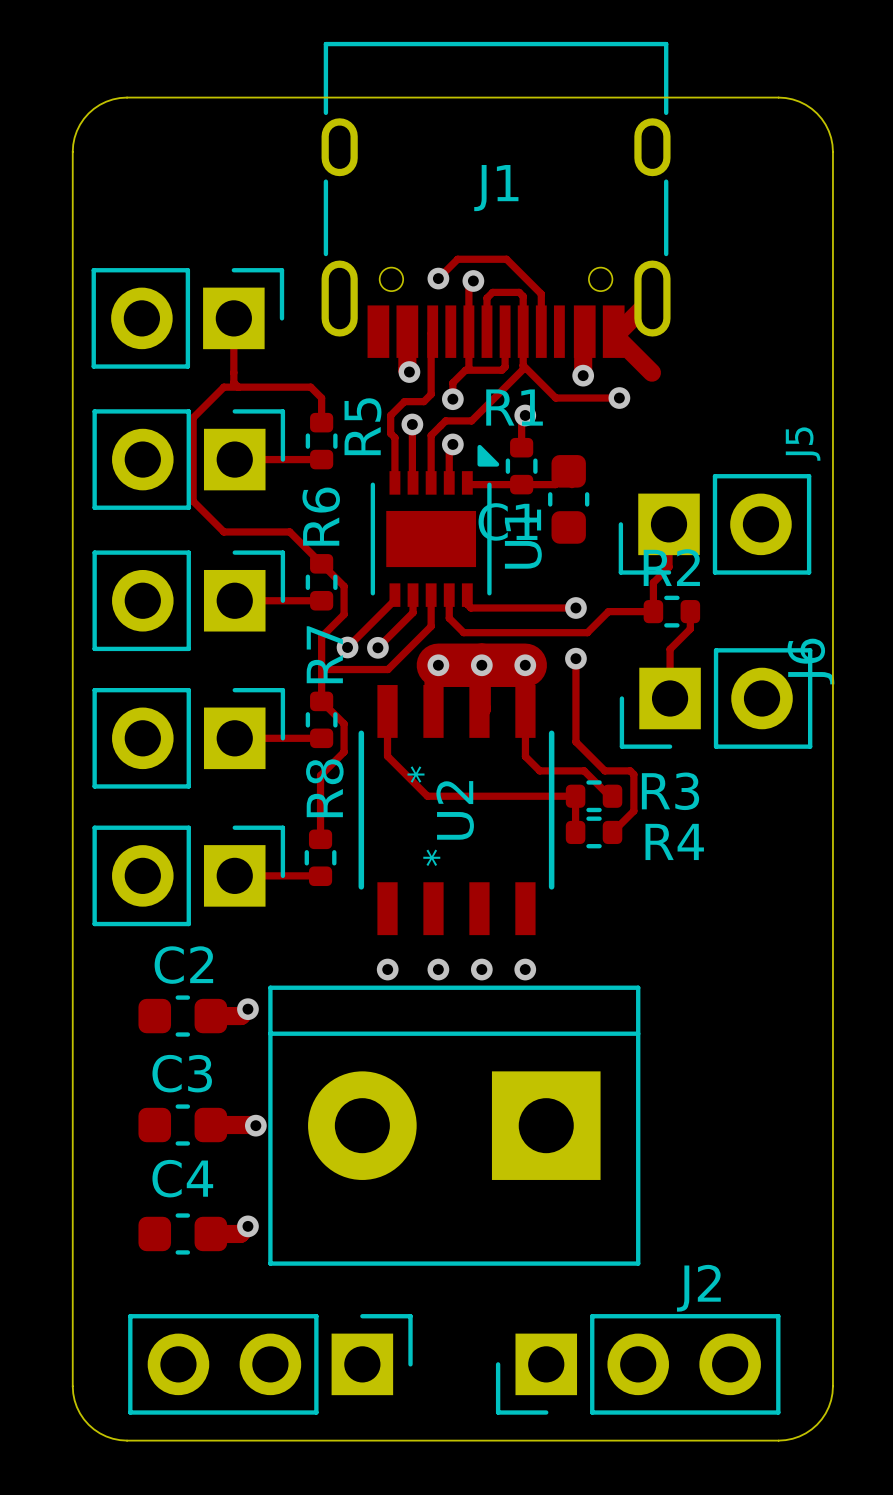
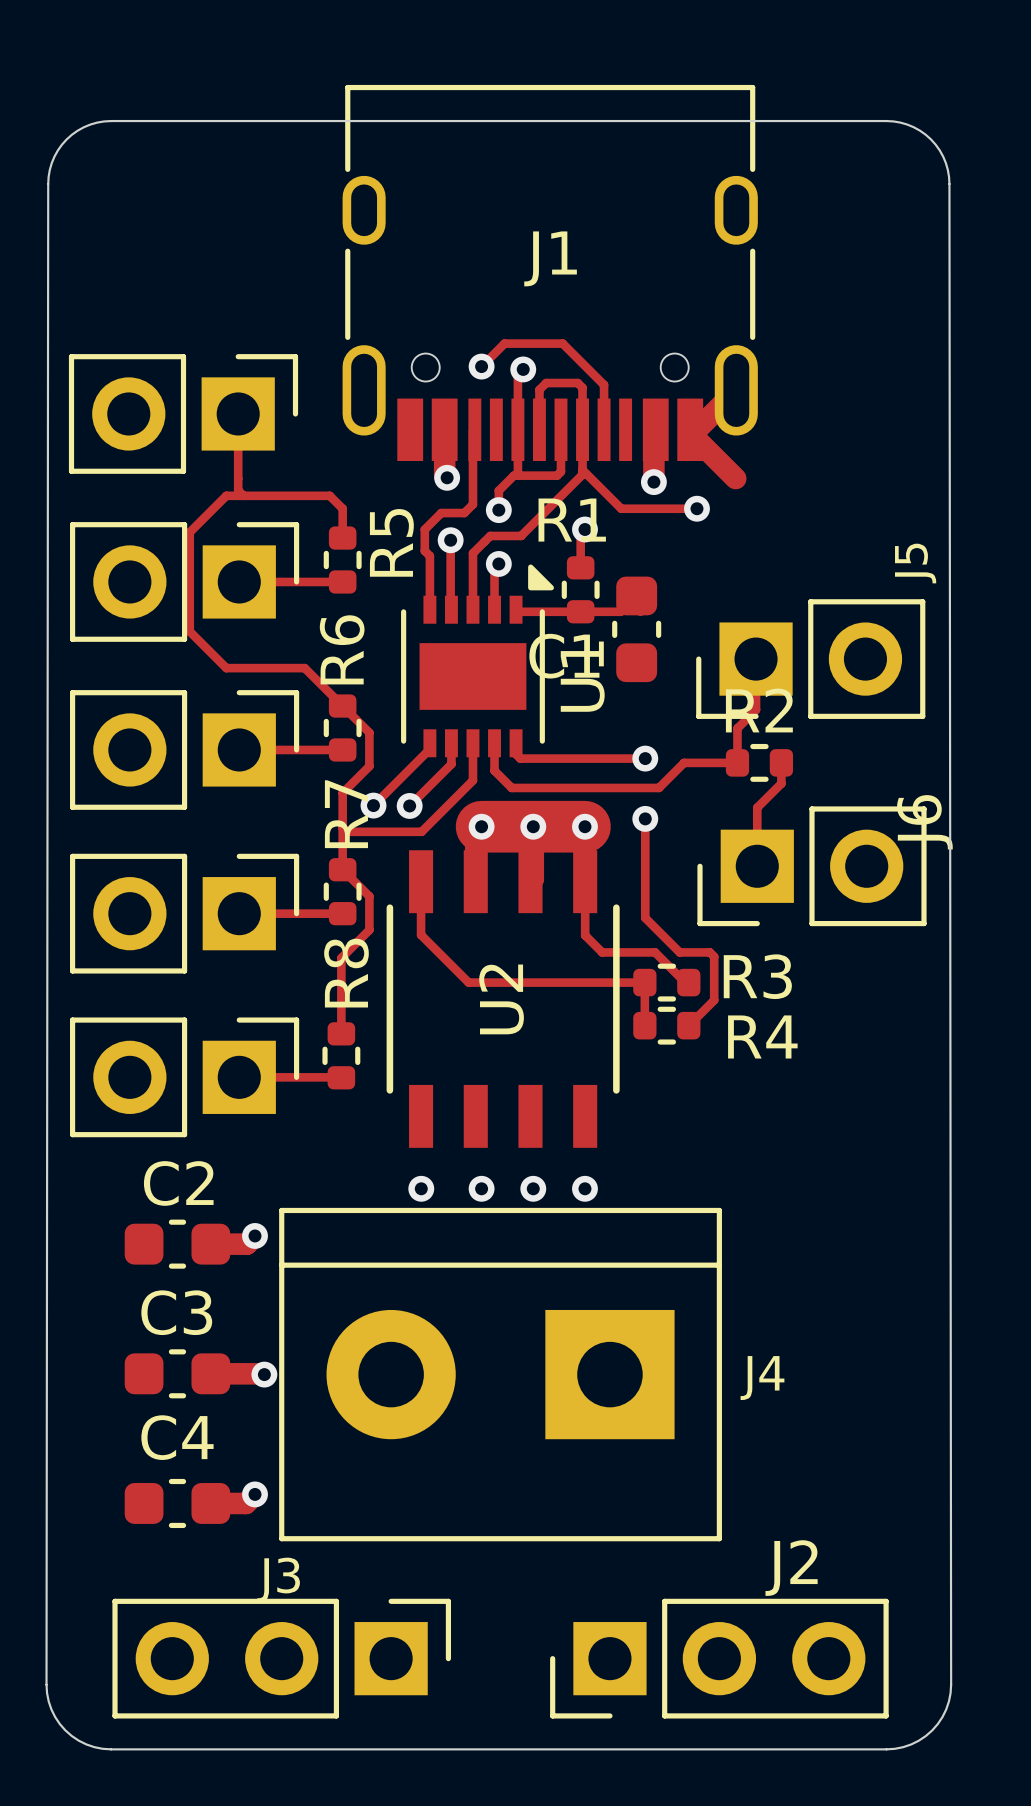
U2 text: * (416, 774) -> none
U2 text: * (431, 857) -> none
J4 name: none -> J4 (762, 1378)
J3 name: none -> J3 (278, 1579)
board edge: (72, 1386) (72, 151) (76, 131) (88, 113) (106, 101) (127, 97) (778, 97) (792, 99) (805, 104) (817, 113) (825, 124) (831, 137) (832, 151) (832, 1386) -> (46, 1684) (48, 183) (49, 169) (54, 156) (61, 144) (77, 130) (97, 122) (111, 121) (886, 121) (907, 124) (920, 130) (931, 139) (939, 150) (945, 163) (949, 183) (951, 1684)

